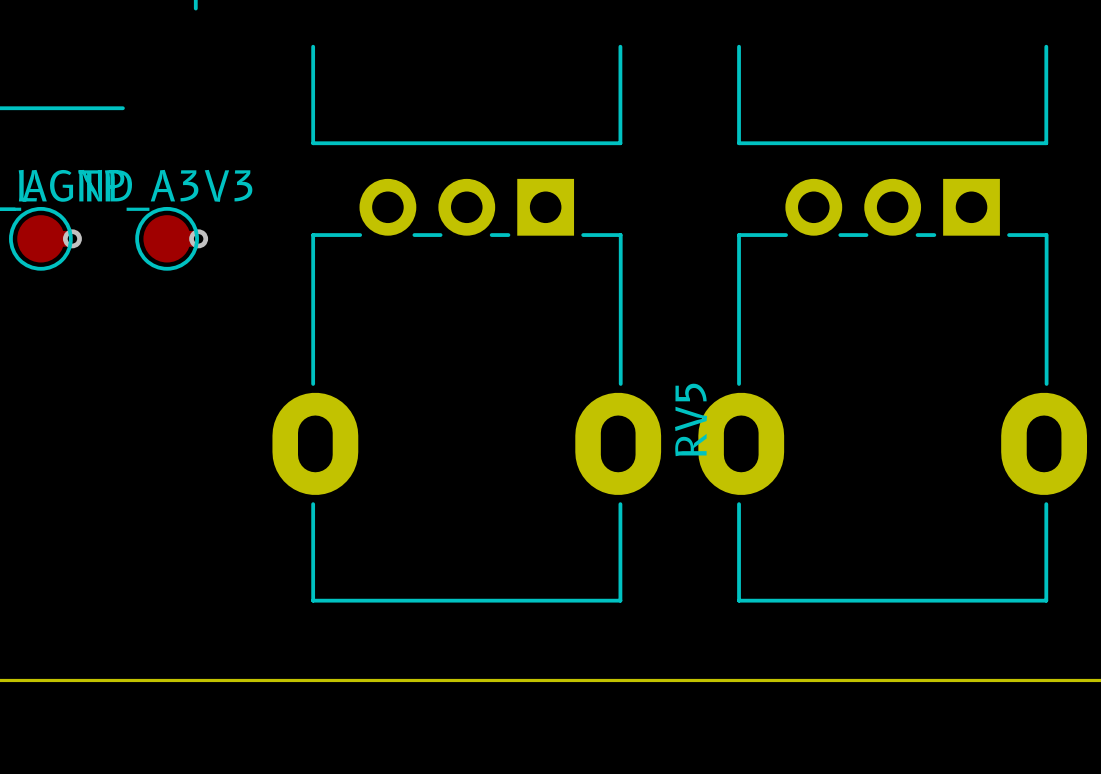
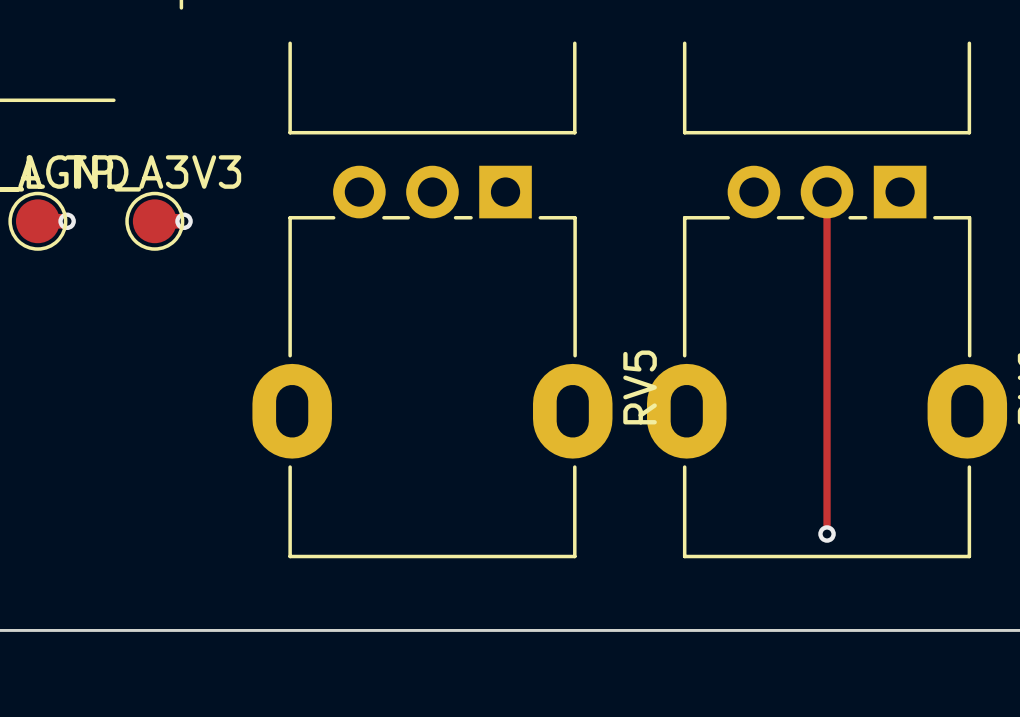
track: none -> (827, 192) (827, 534)
via: none -> (827, 534)

